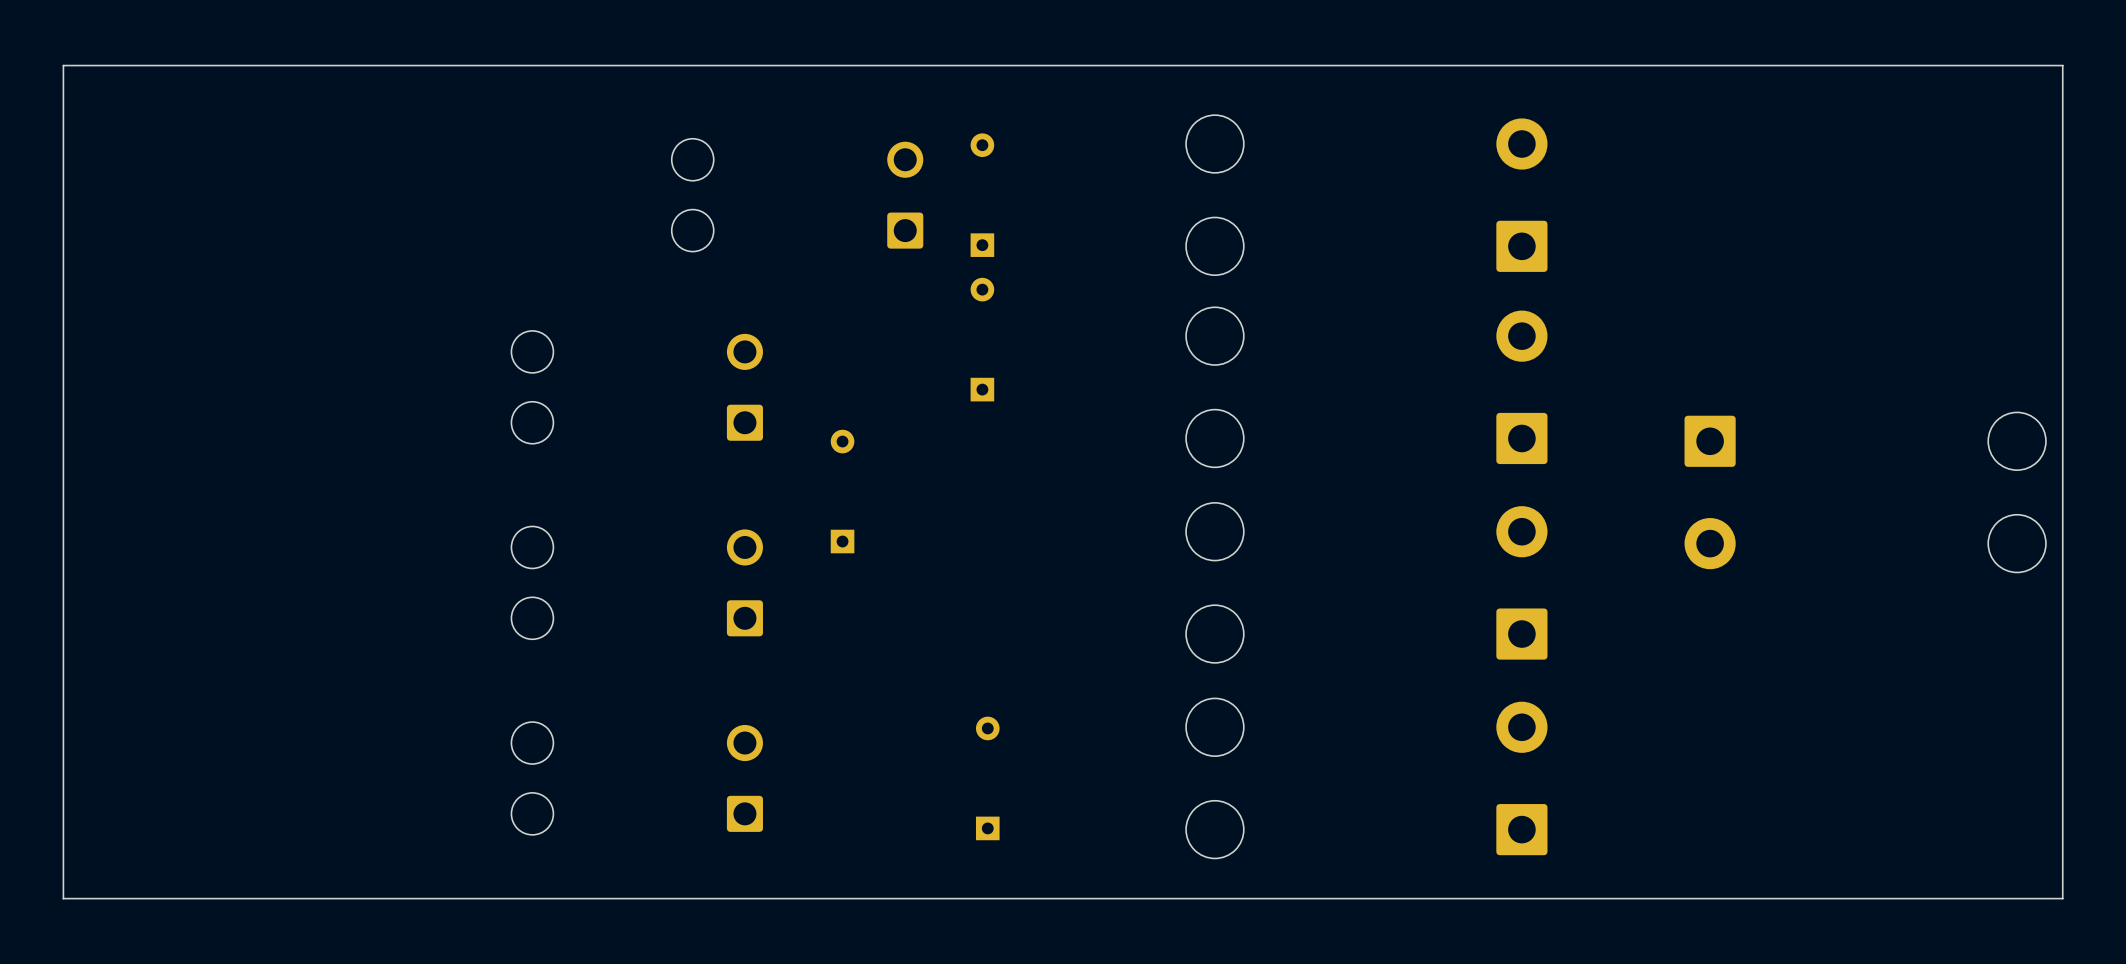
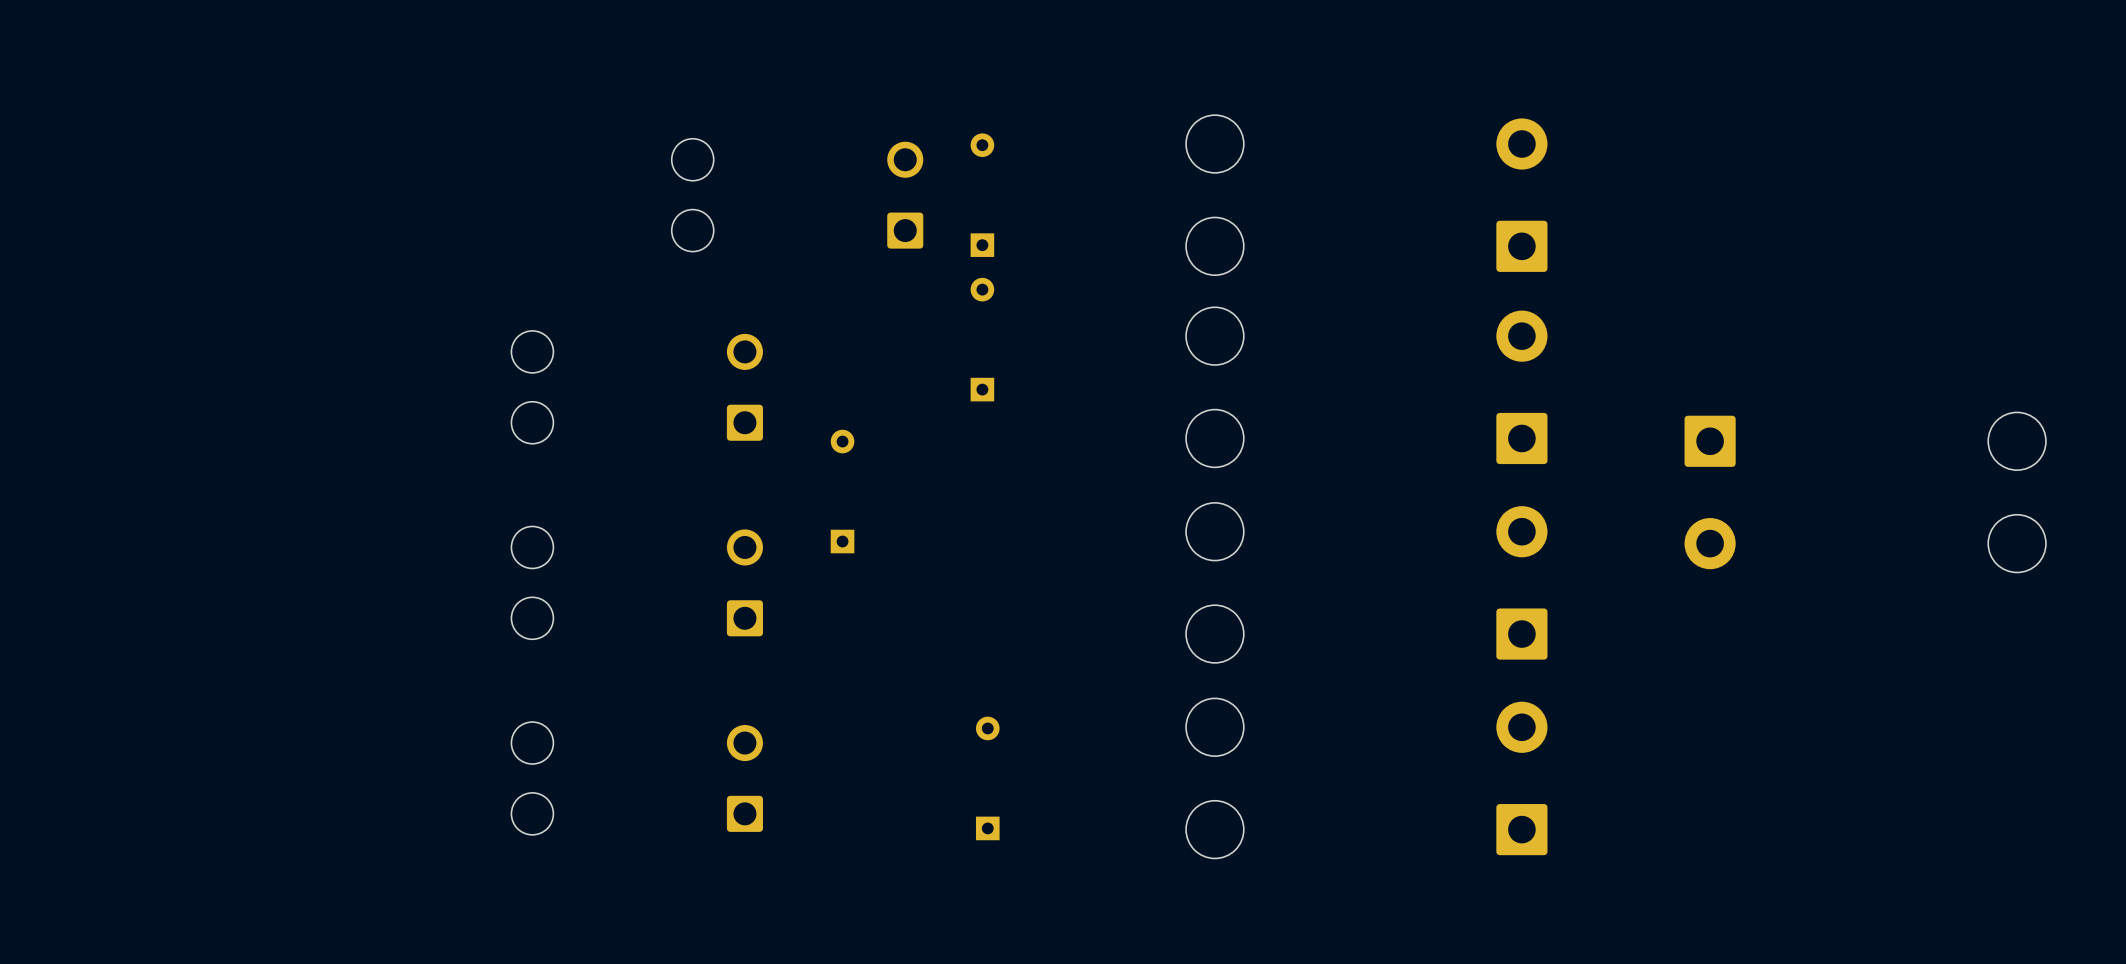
board edge: (2062, 65) (63, 65) (63, 898) (2062, 898) (2062, 65) -> none

